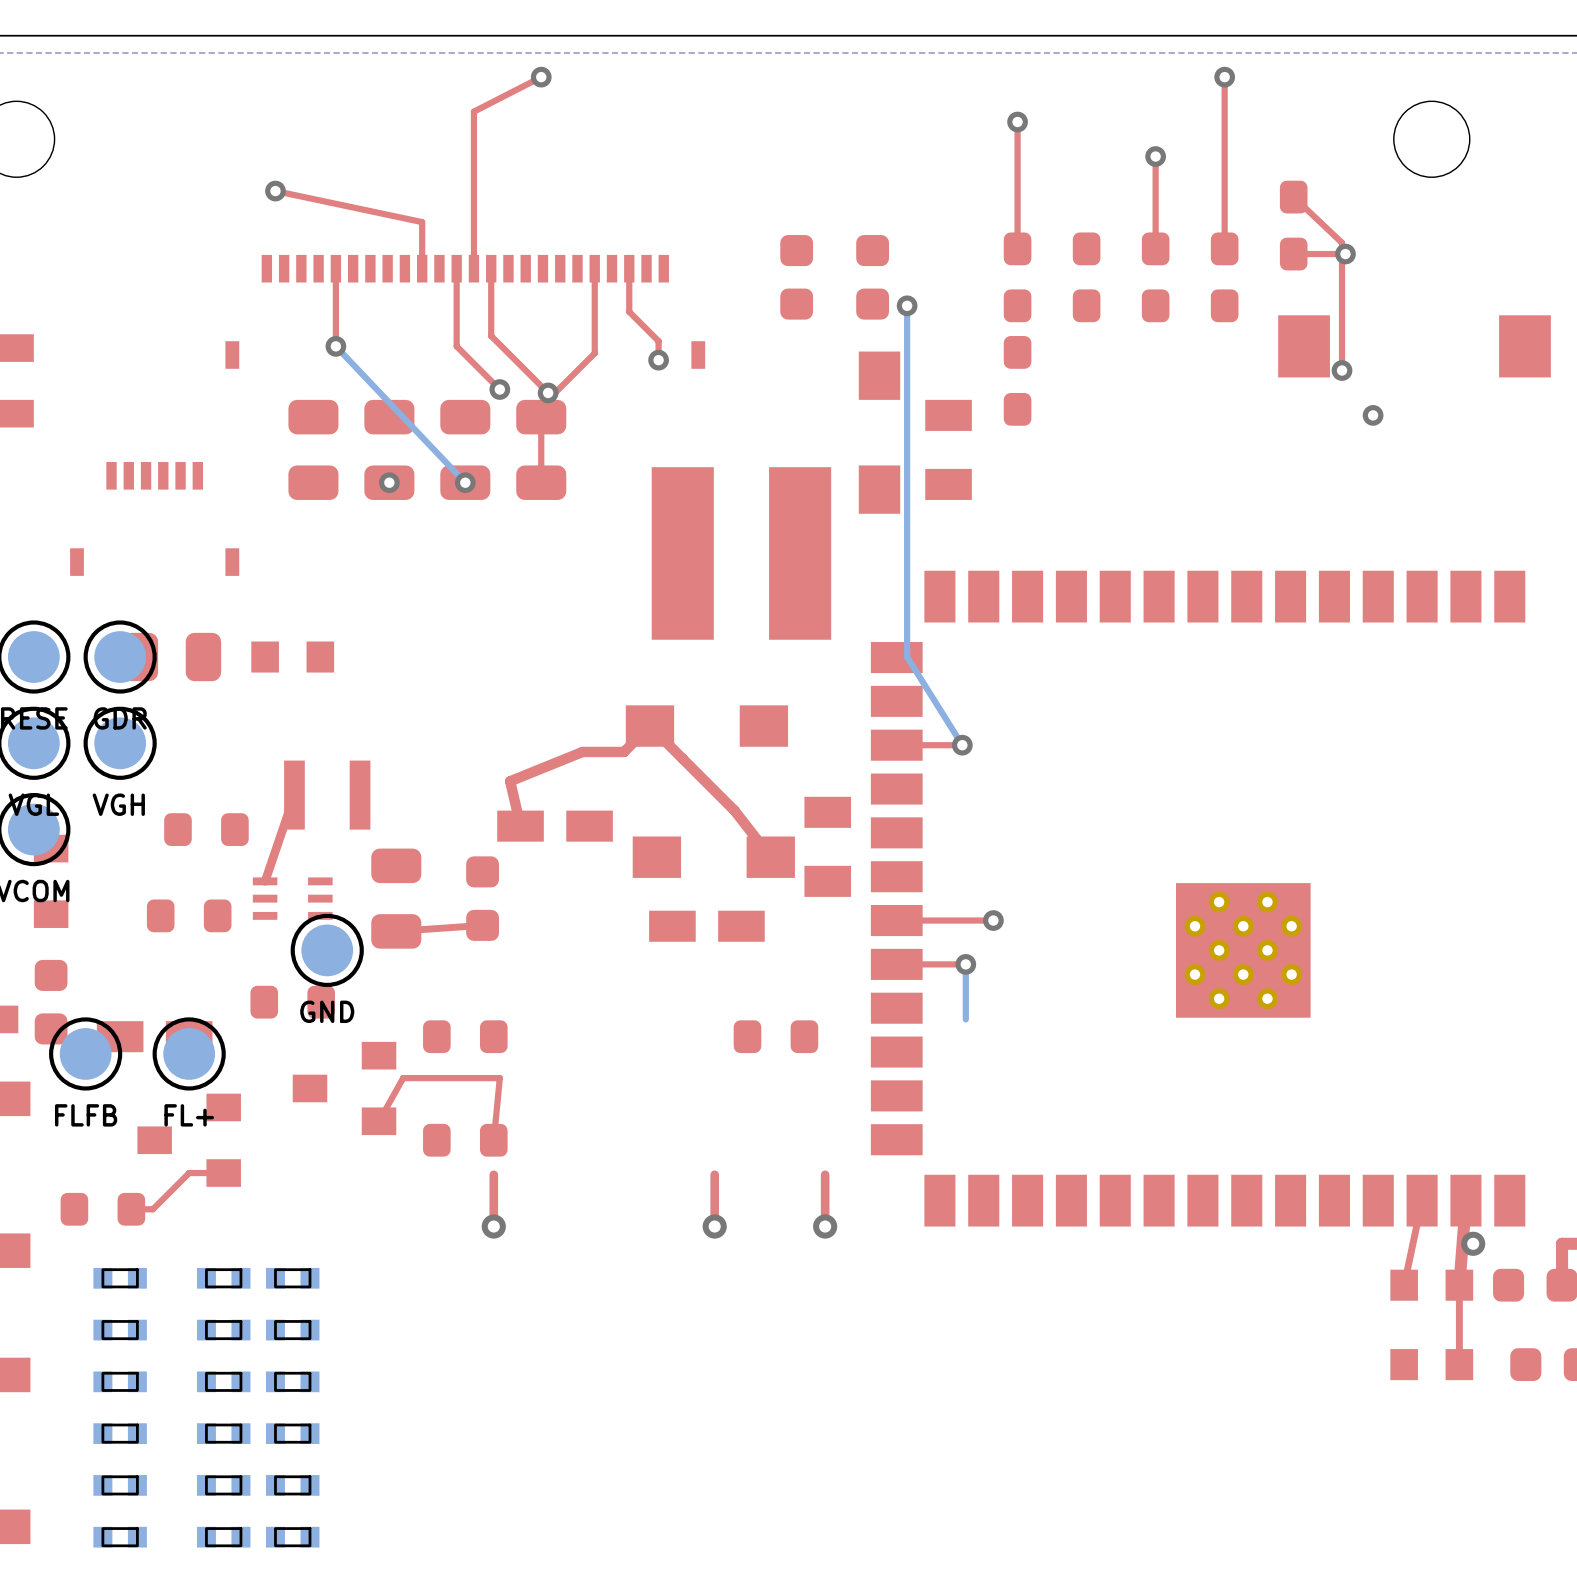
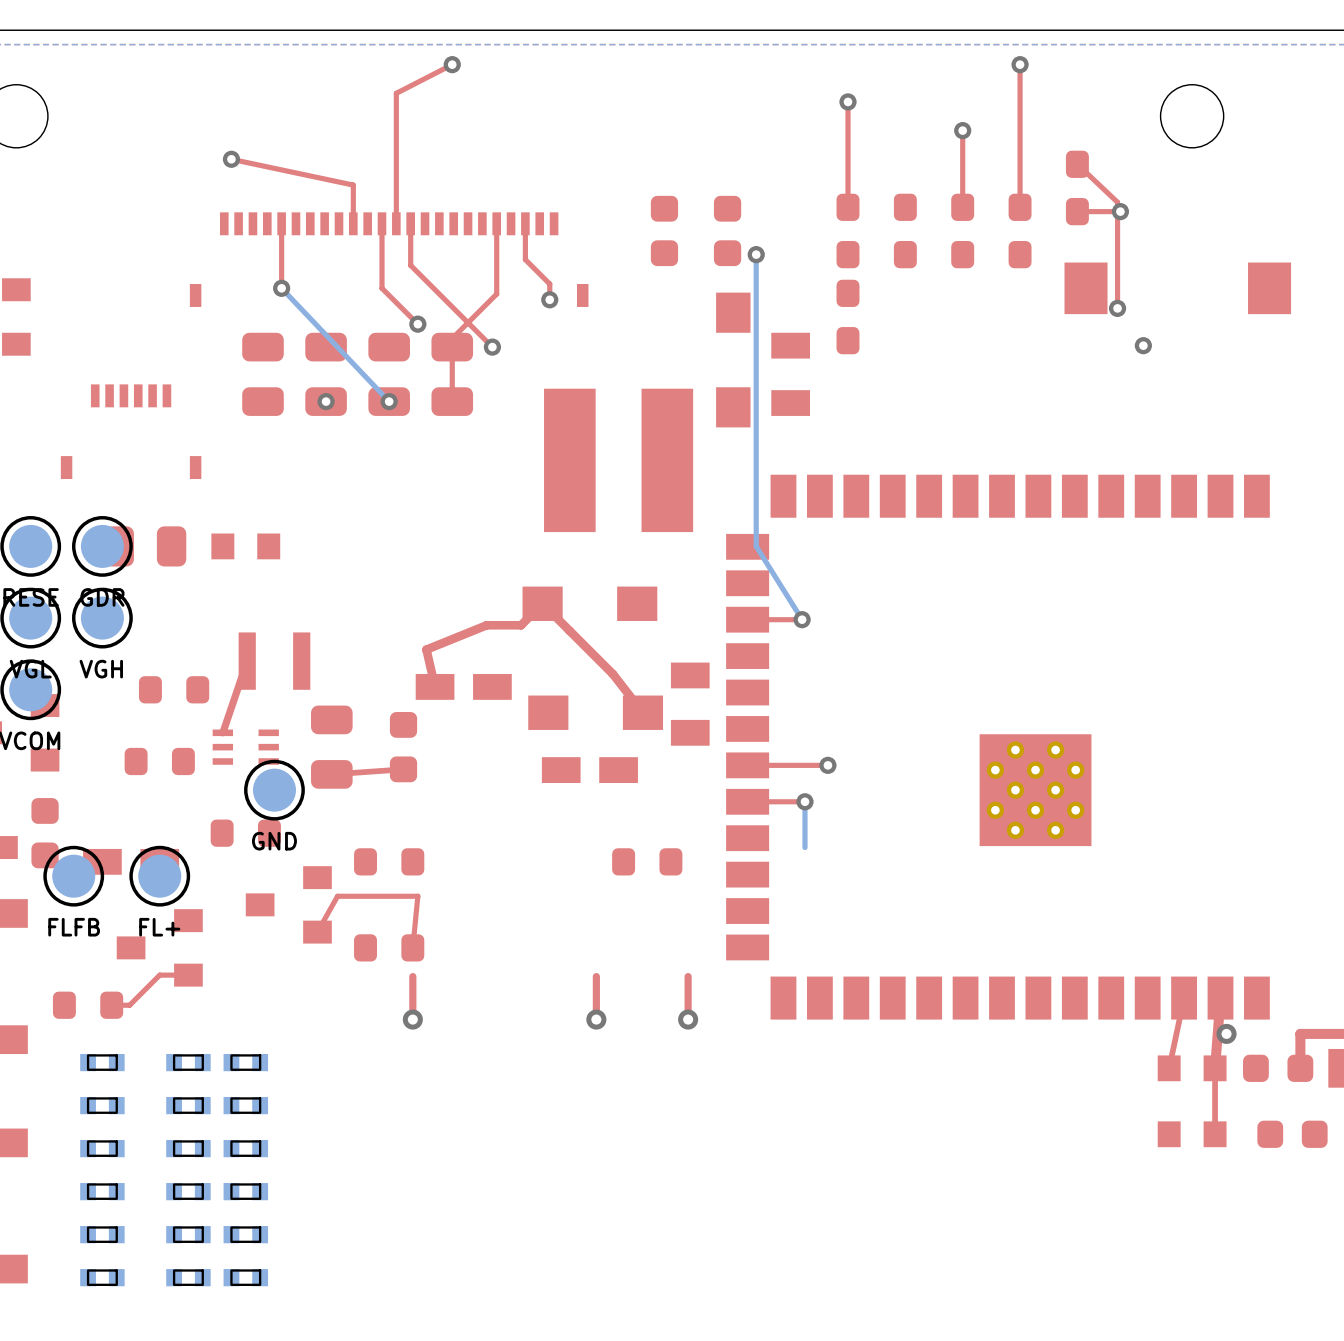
top track: (491, 318) (491, 336) (548, 392) -> (410, 265) (492, 347)
via position: (548, 392) -> (492, 347)

